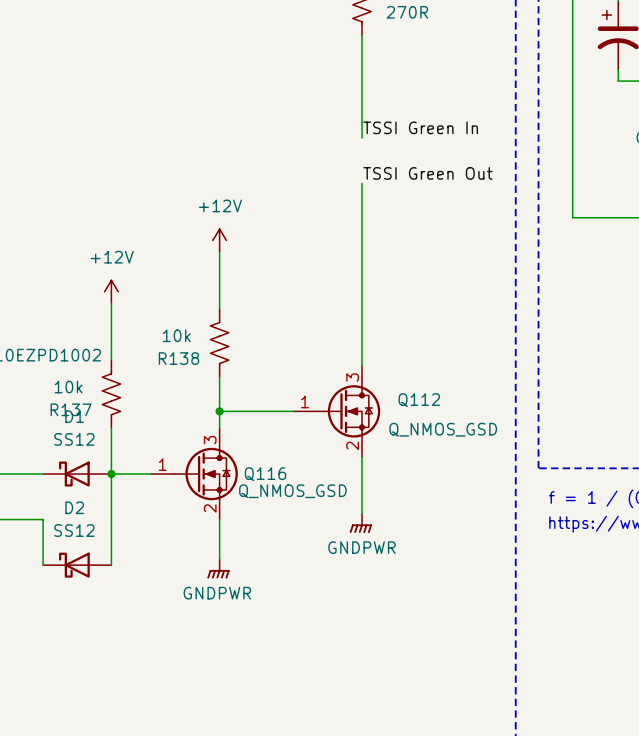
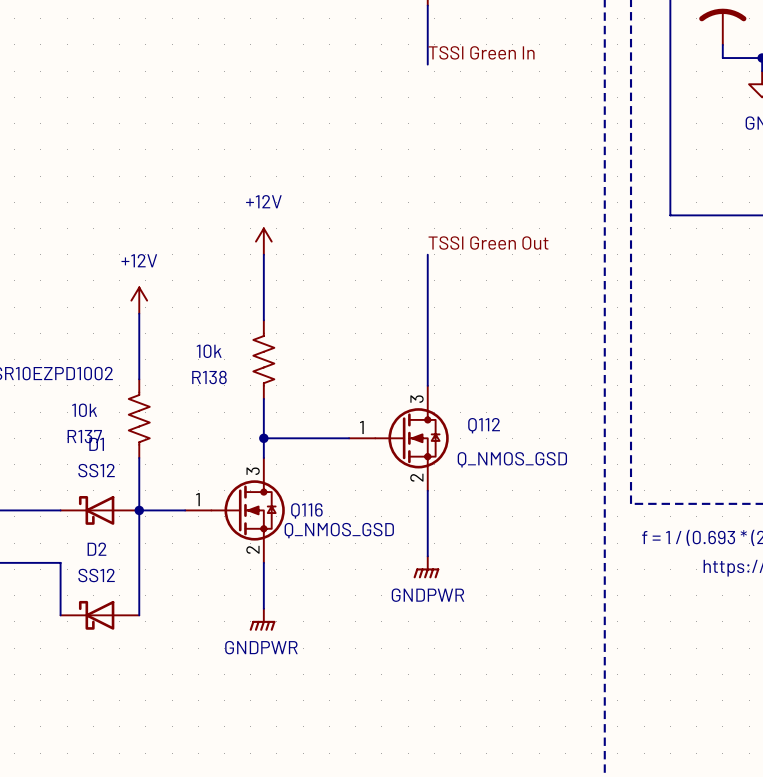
wire: (361, 86) (361, 138) -> none
label position: TSSI Green In (420, 127) -> TSSI Green In (481, 52)
label position: TSSI Green Out (427, 173) -> TSSI Green Out (488, 243)
wire: (361, 183) (361, 251) -> none

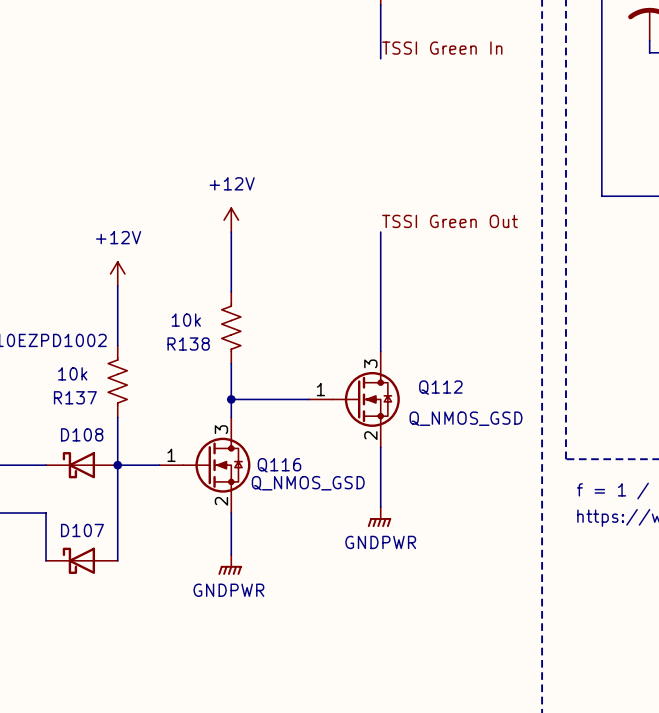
D1 name: D1 (96, 444) -> D108 (82, 434)
D1 value: SS12 (96, 470) -> none
D2 name: D2 (96, 549) -> D107 (82, 530)
D2 value: SS12 (96, 575) -> none

